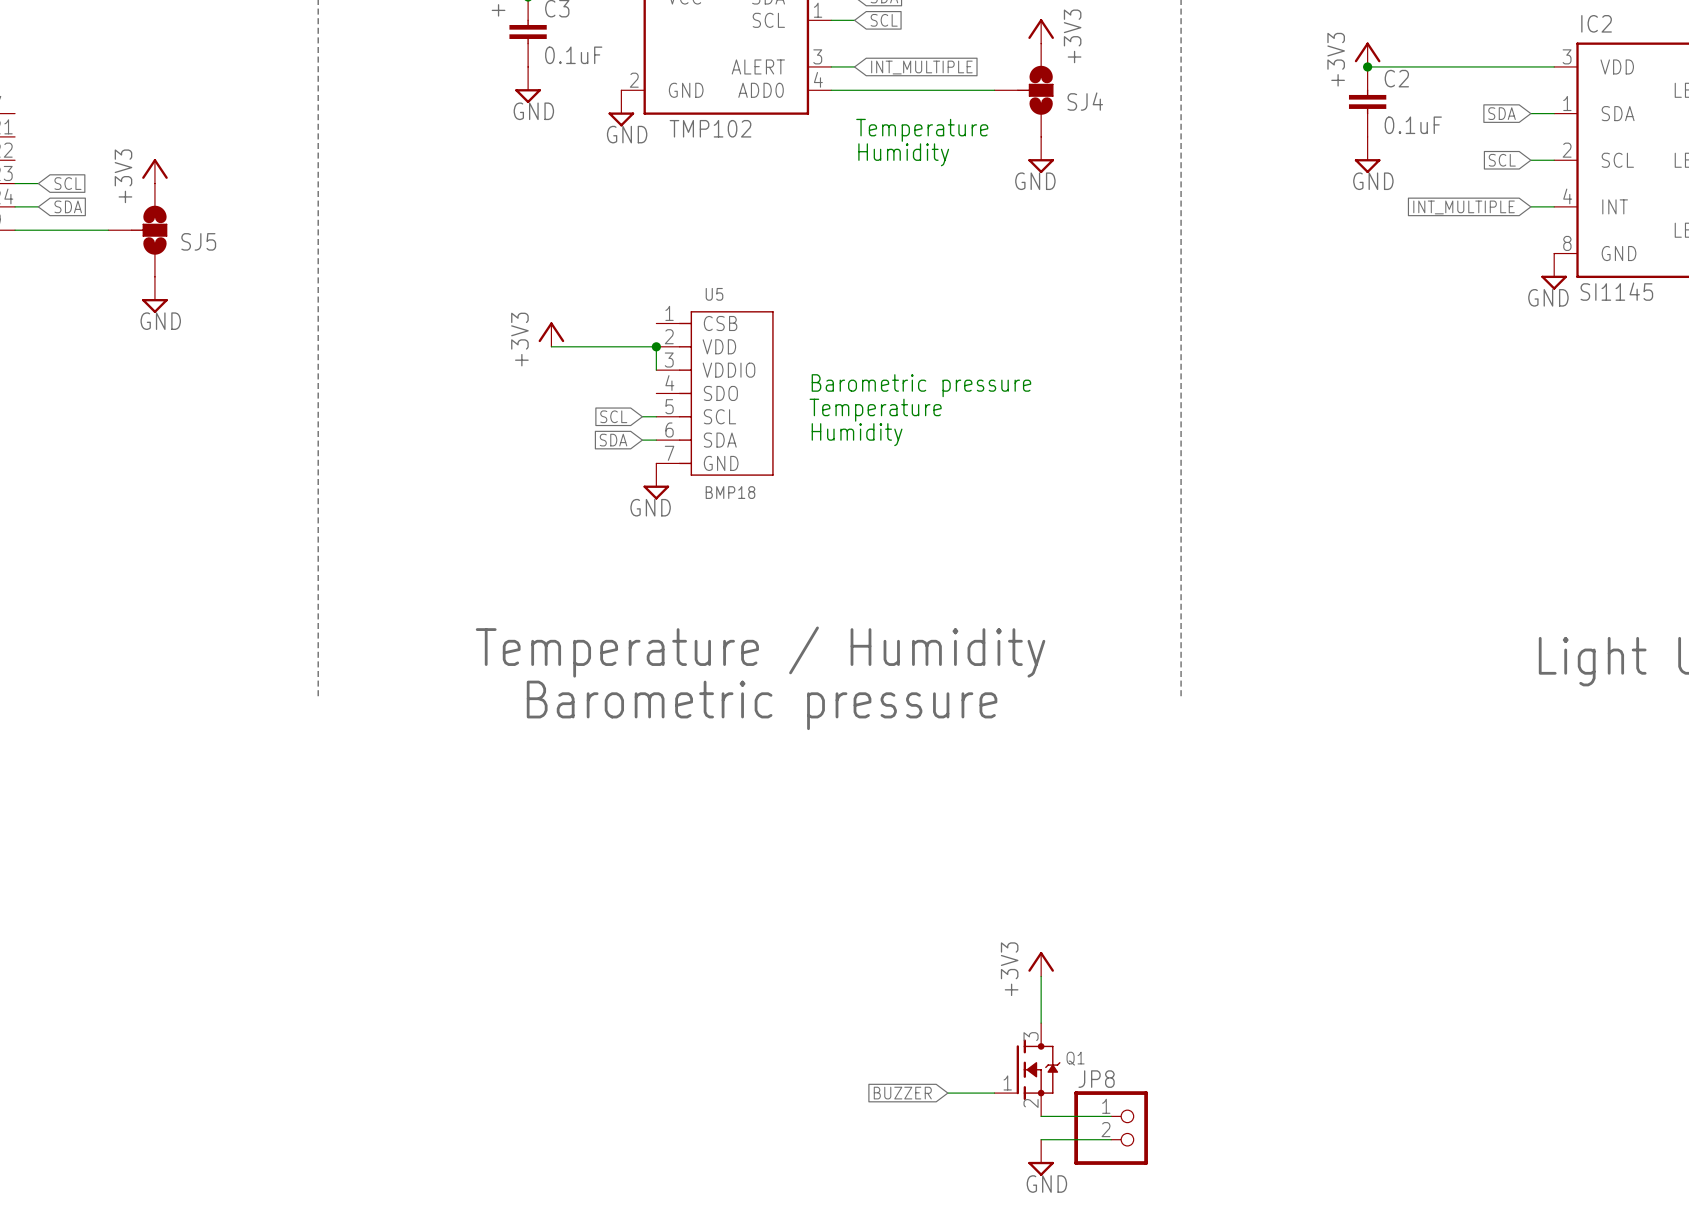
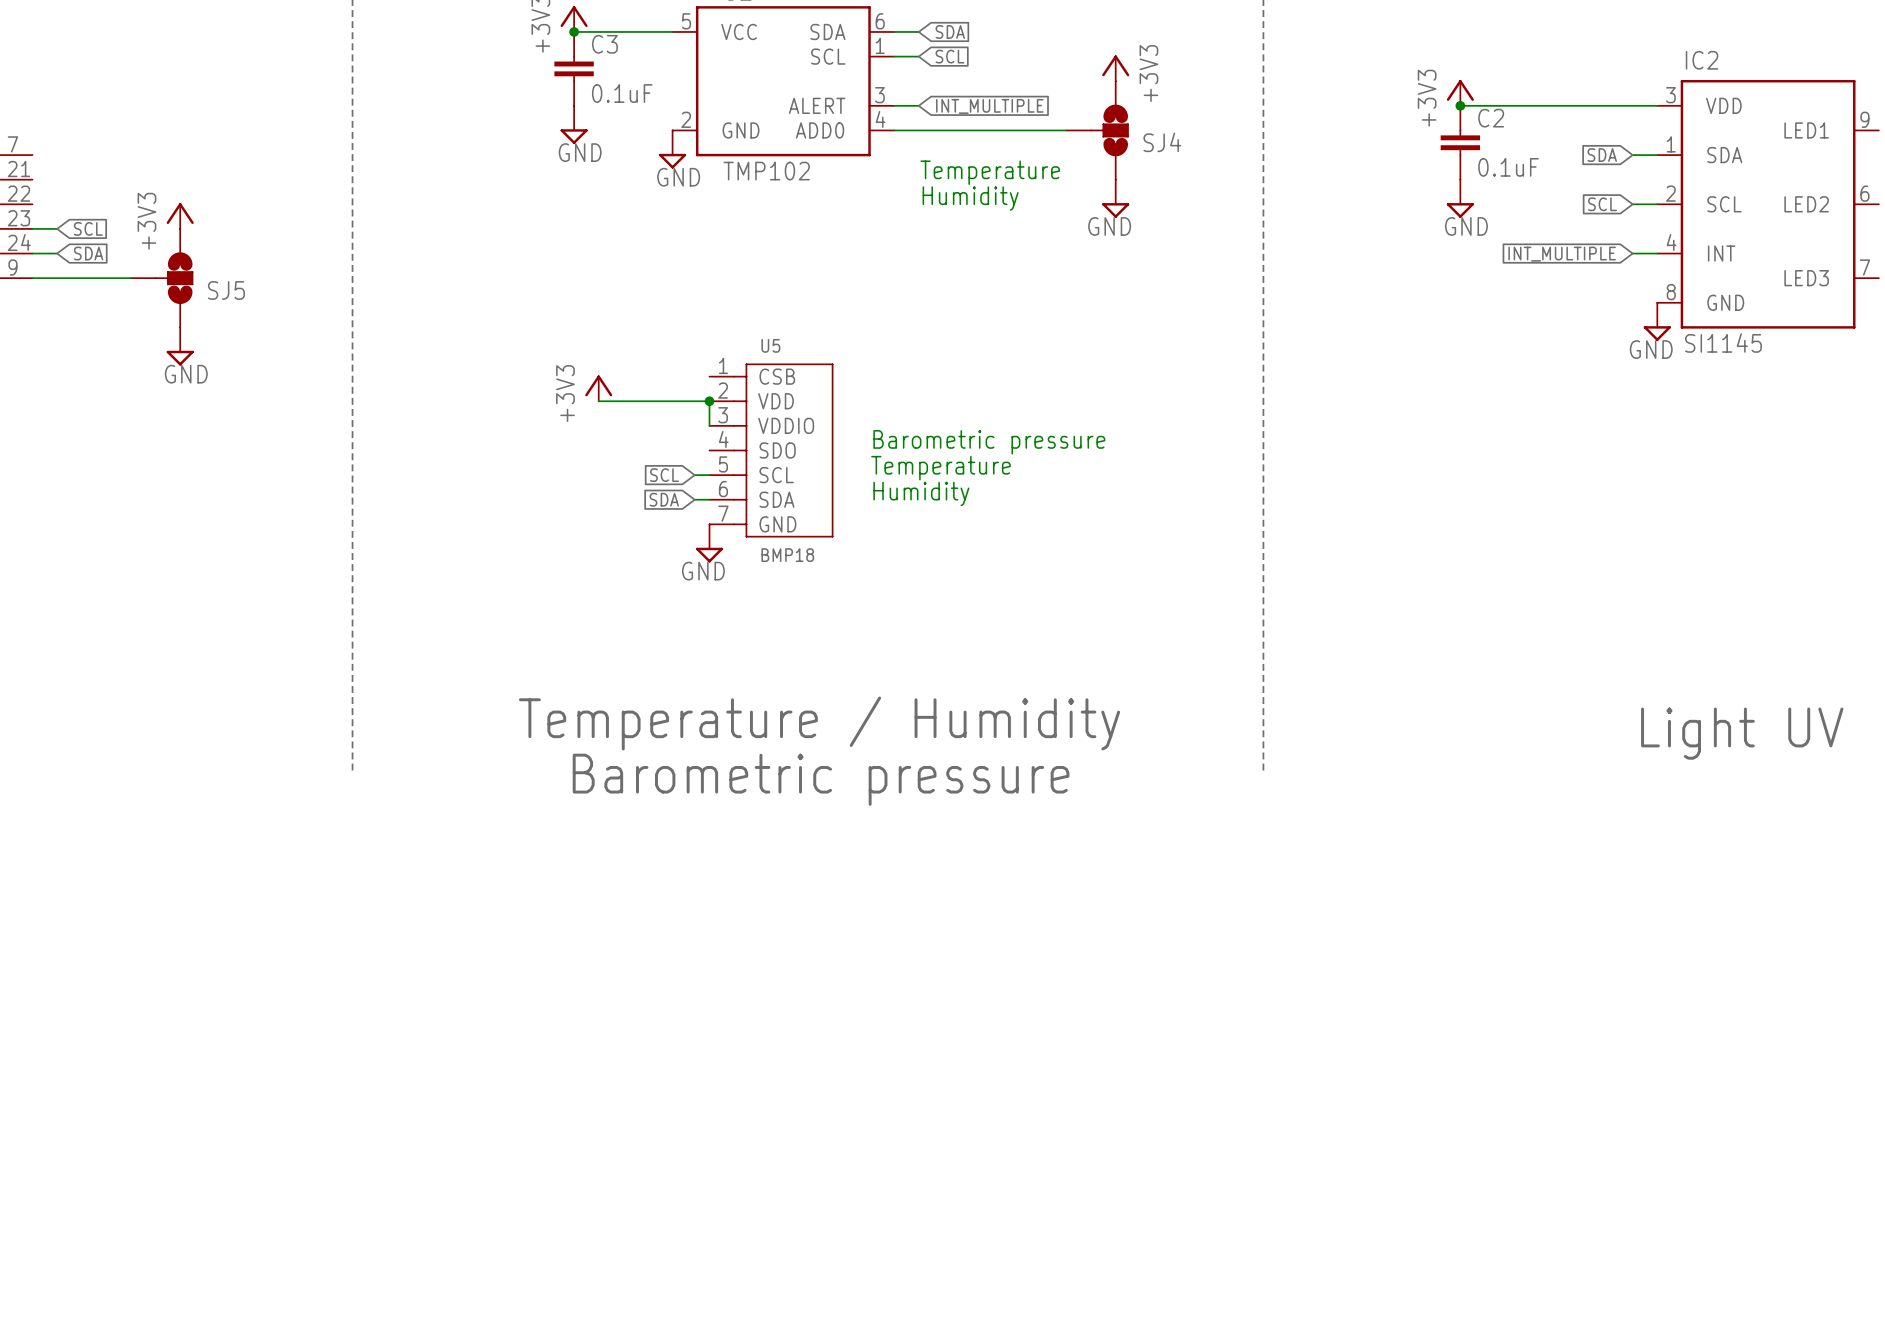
power symbol: +3V3 (1041, 964) -> none
wire: (1041, 976) (1041, 1023) -> none
Q1: (1027, 1069) -> none
global label: BUZZER (902, 1093) -> none
wire: (947, 1093) (994, 1093) -> none
wire: (1041, 1116) (1111, 1116) -> none
JP8: (1111, 1128) -> none
wire: (1041, 1139) (1111, 1139) -> none
power symbol: GND (1041, 1157) -> none

